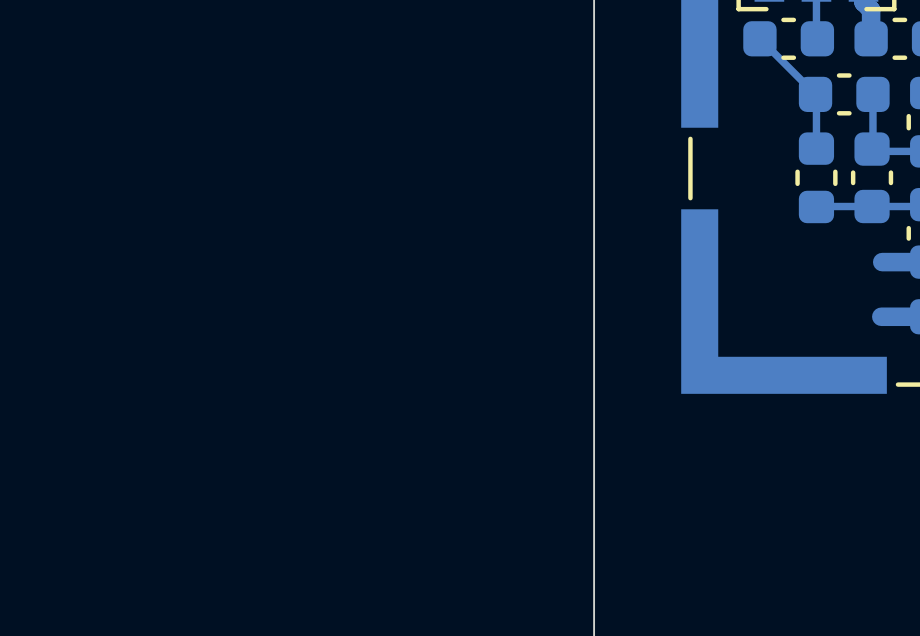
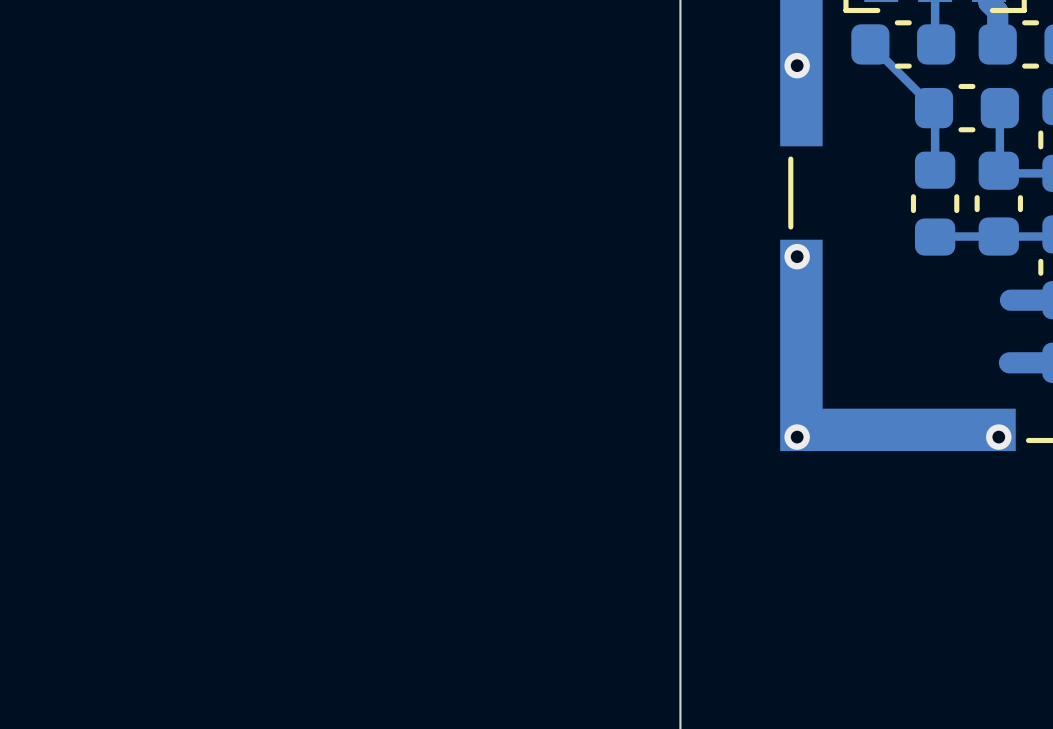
via: none -> (797, 65)
via: none -> (797, 256)
via: none -> (797, 437)
via: none -> (998, 437)

